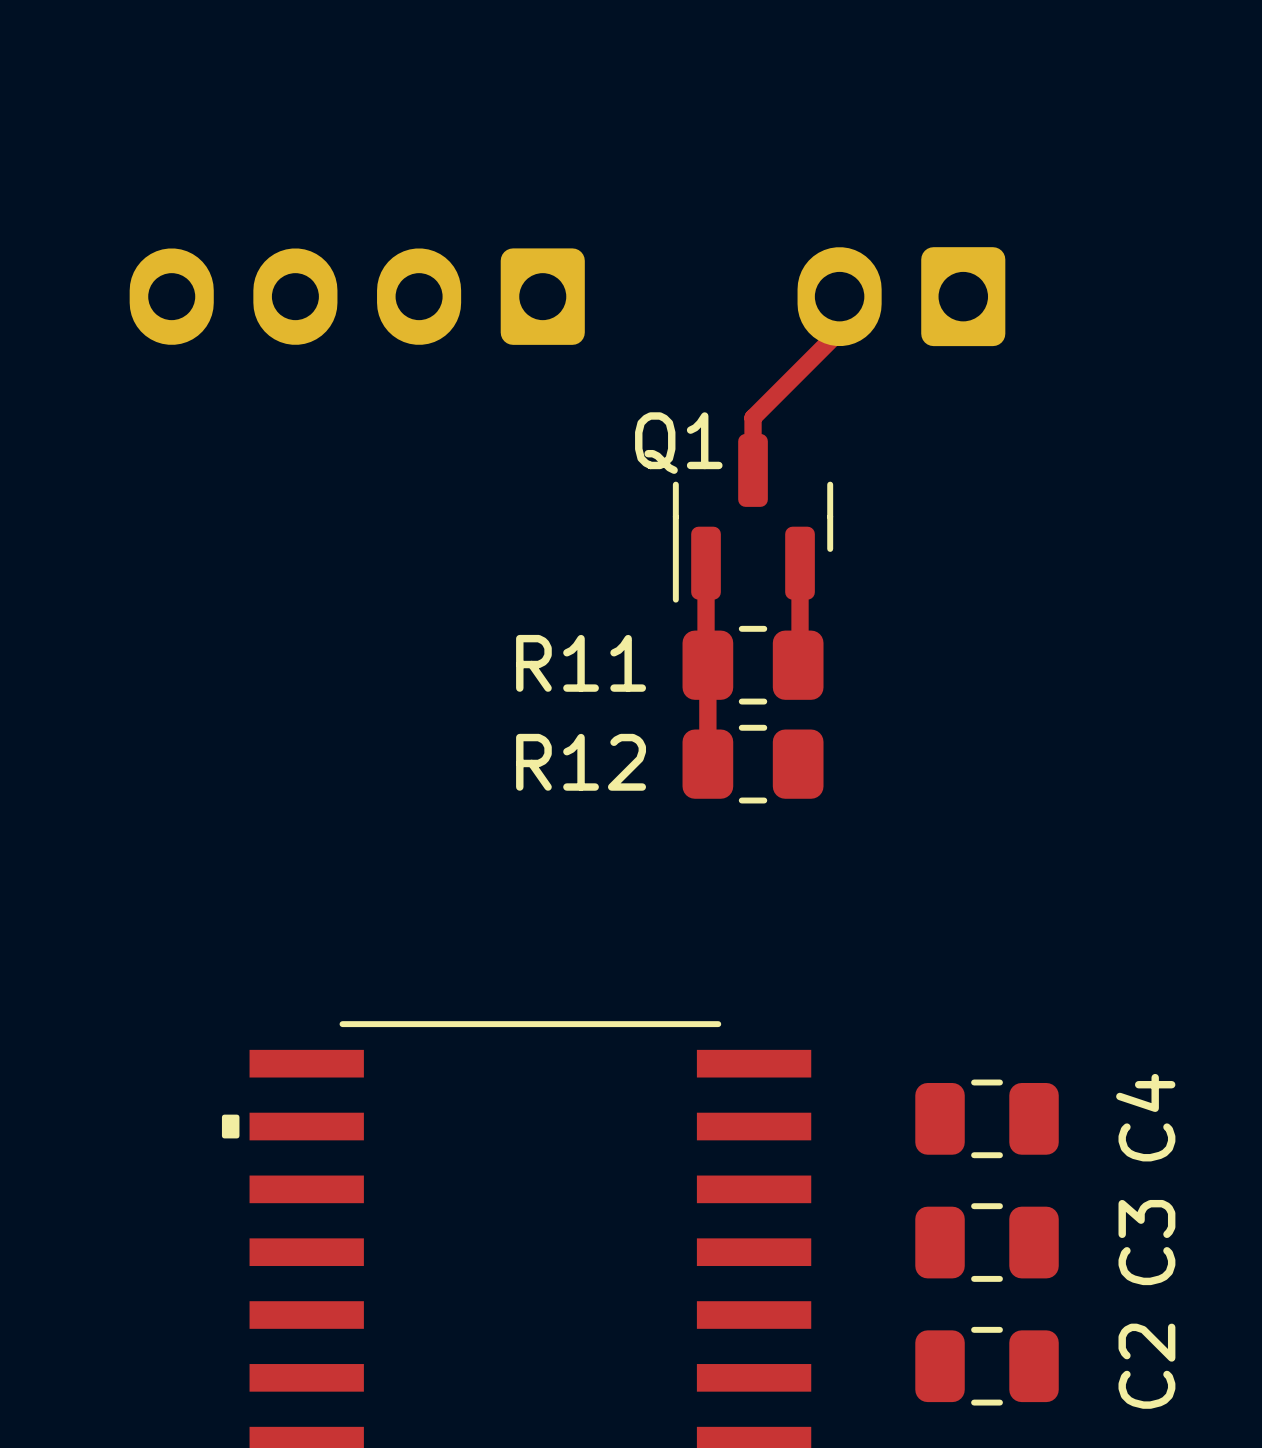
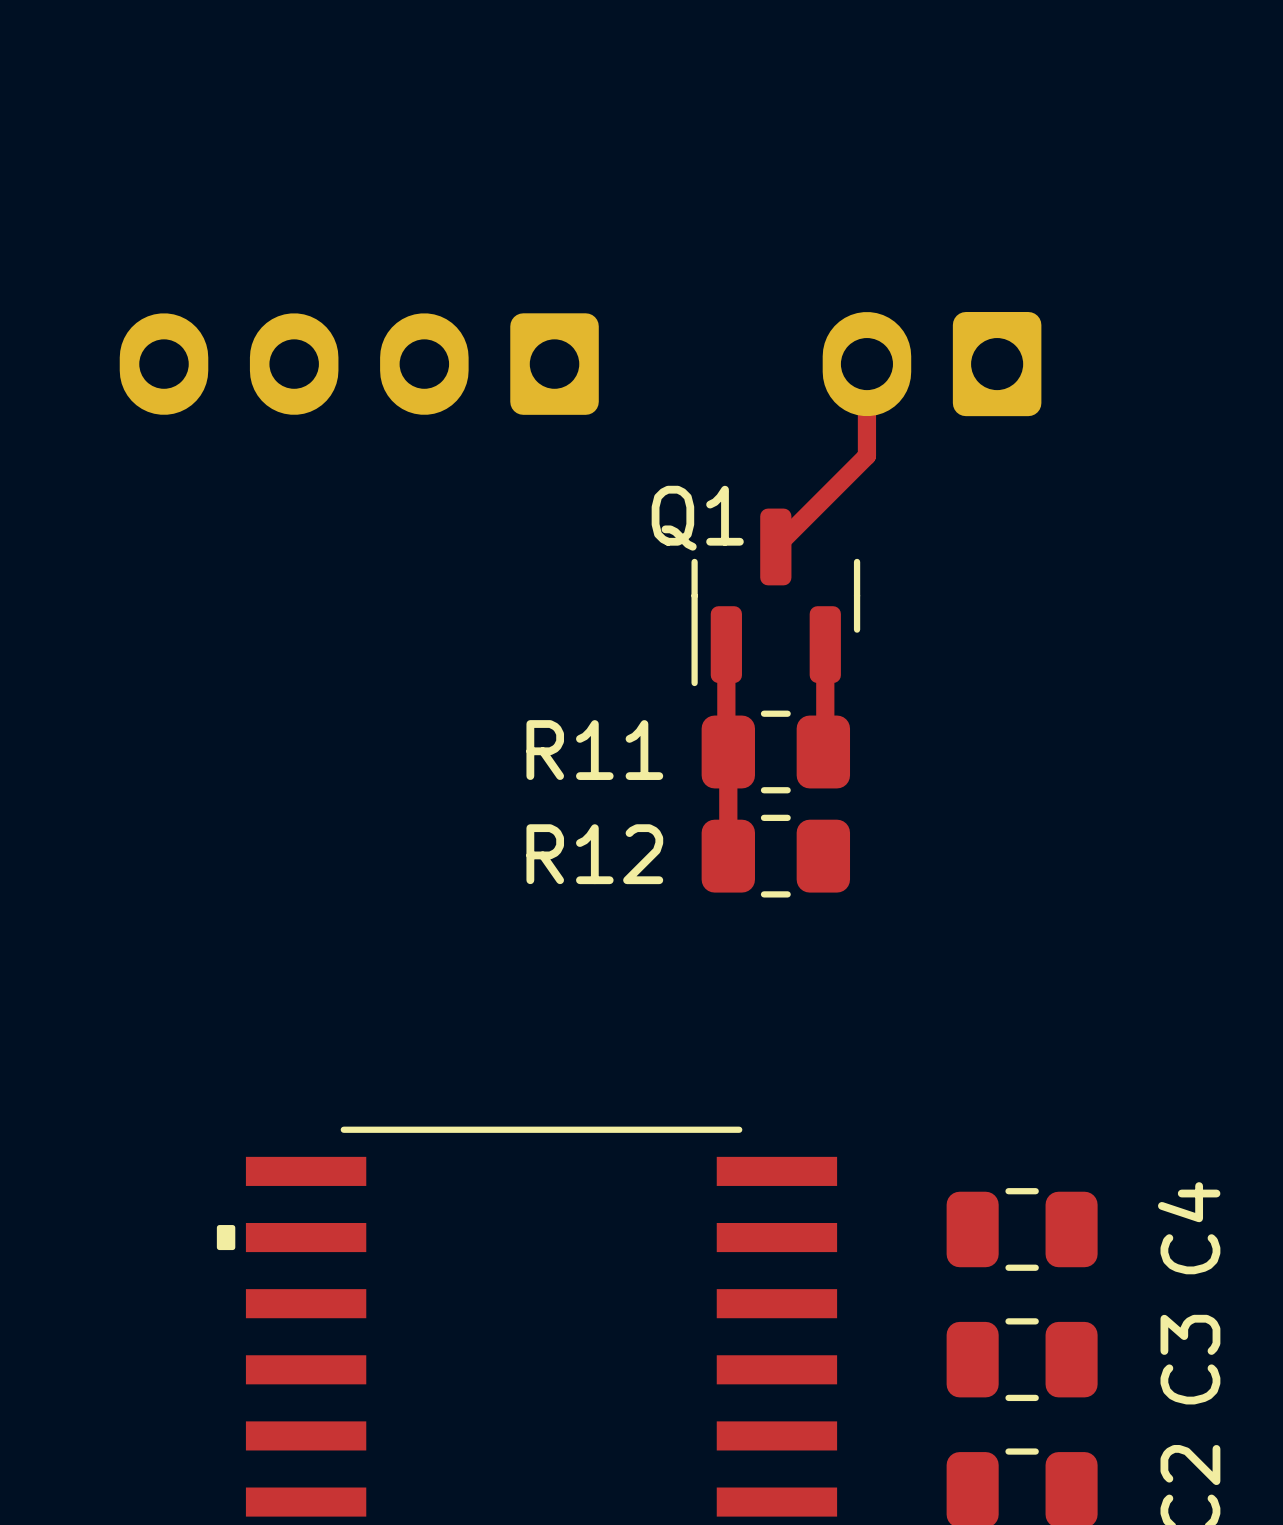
track: (839, 331) (753, 417) (753, 470) -> (866, 400) (866, 455) (775, 546)

